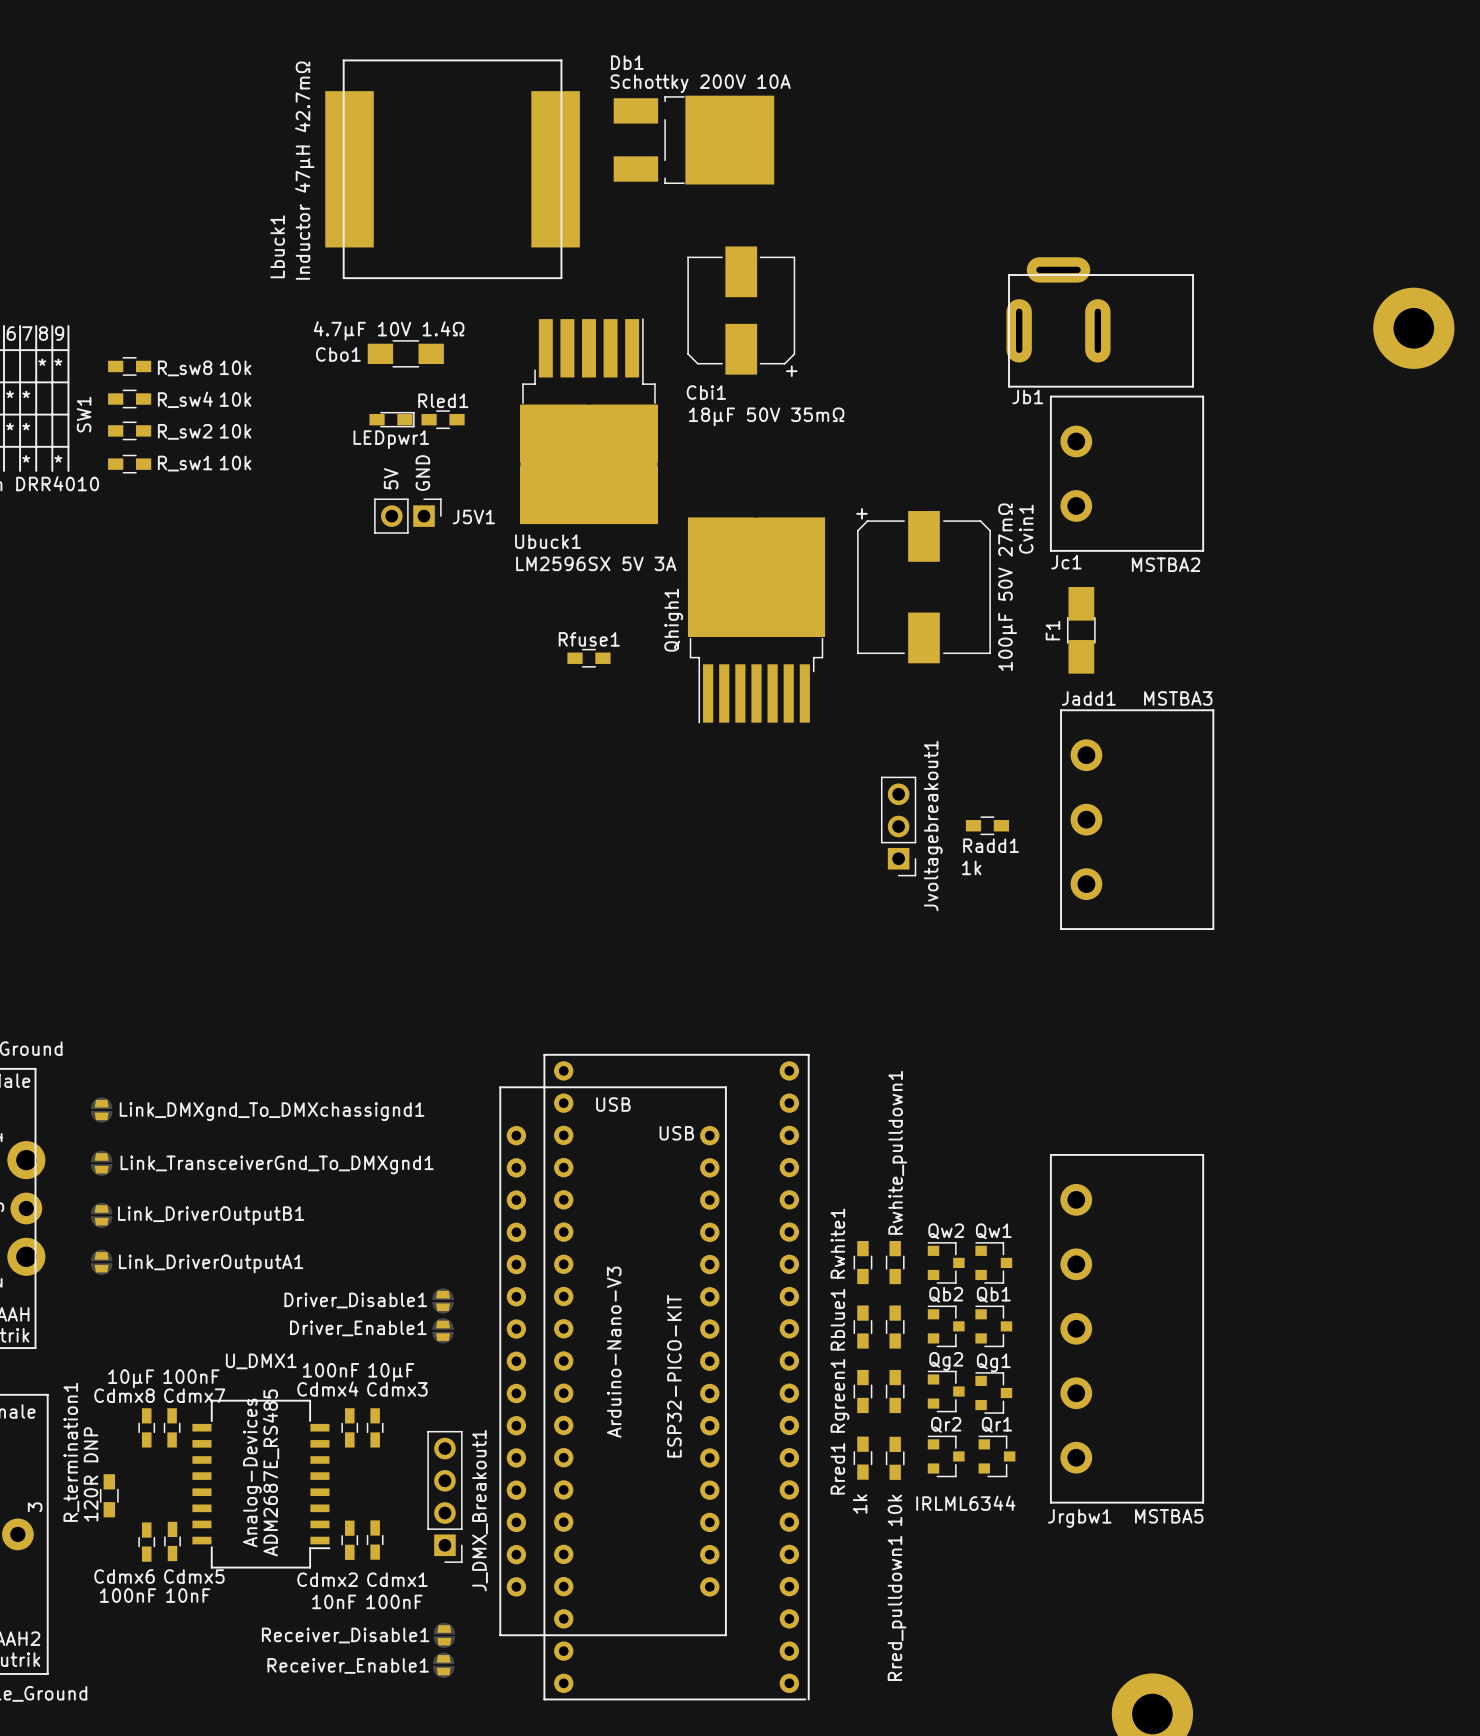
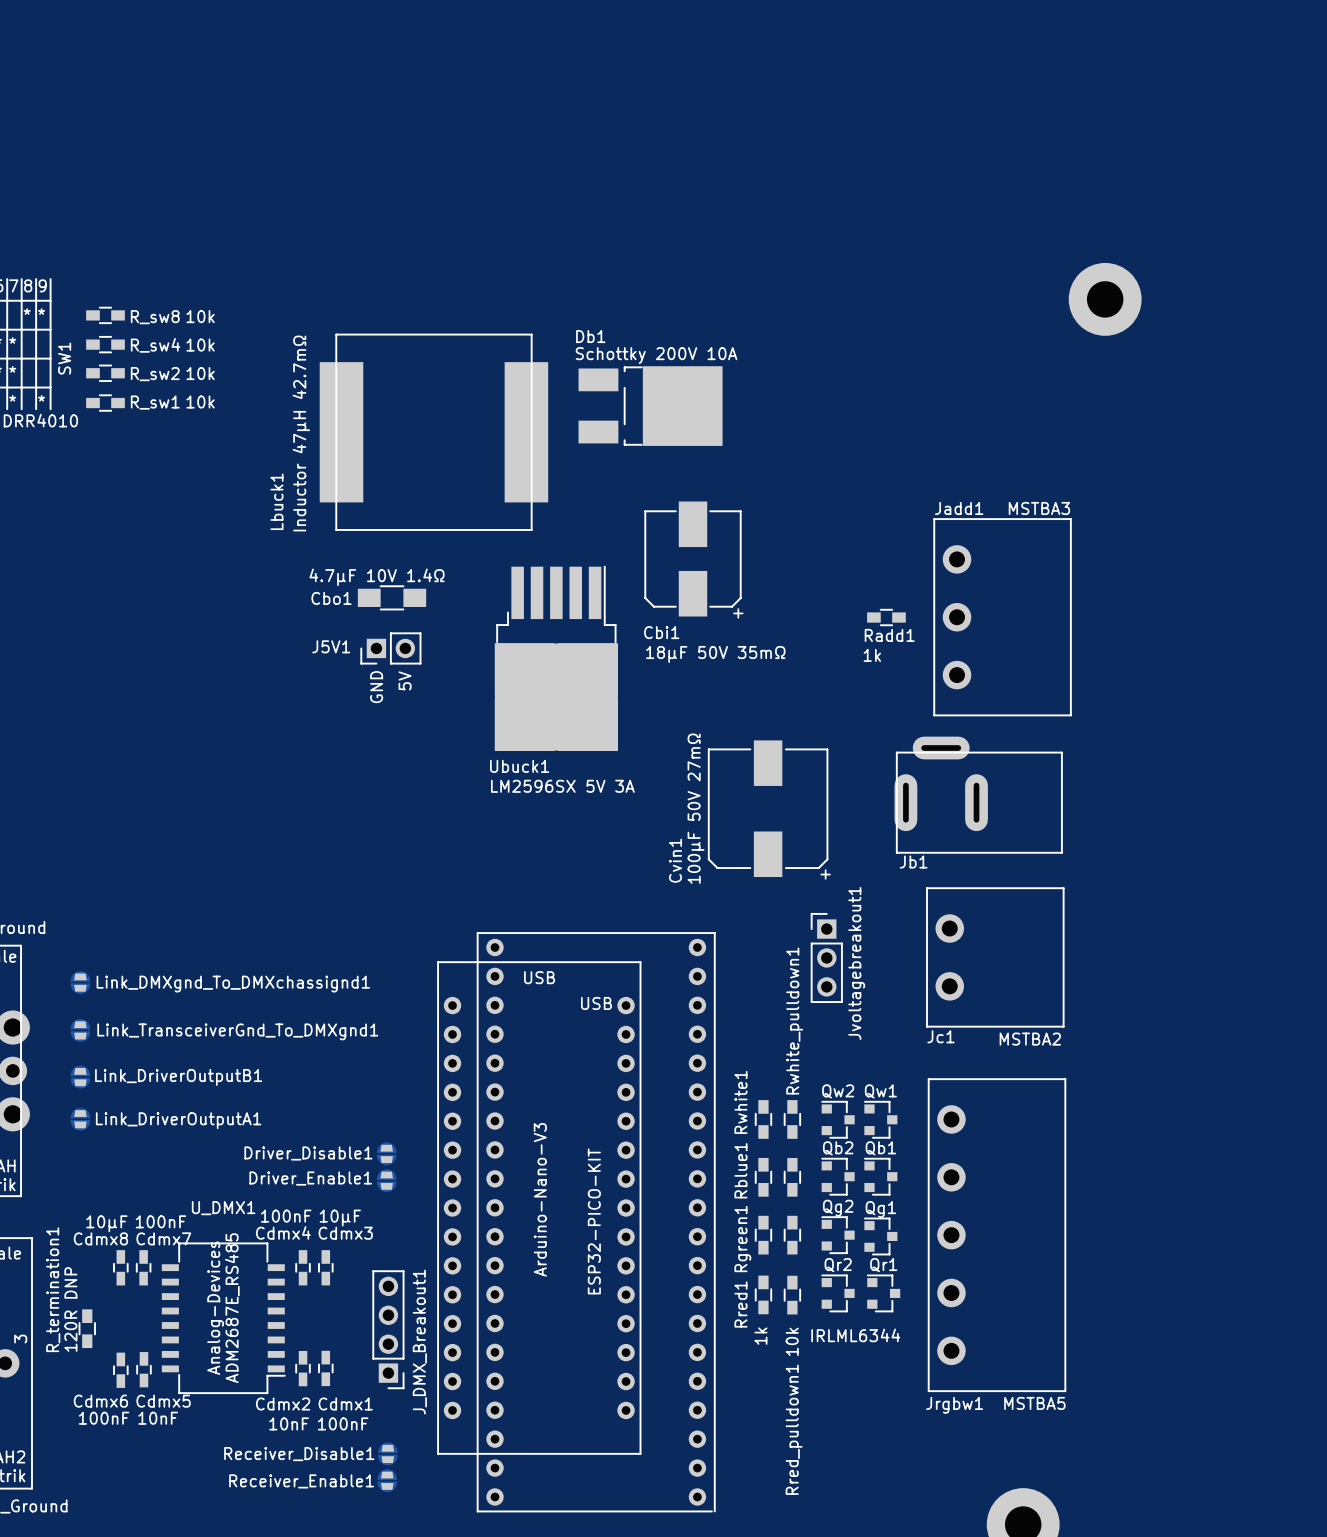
Db1 position: (693, 140) -> (650, 406)
Lbuck1 position: (452, 169) -> (433, 432)
Cbi1 position: (741, 310) -> (693, 559)
Jb1 position: (1100, 322) -> (978, 795)
part position: (1413, 328) -> (1105, 299)
Cbo1 position: (405, 353) -> (392, 597)
LEDpwr1: (392, 419) -> none
Rled1: (443, 419) -> none
Ubuck1 position: (588, 421) -> (556, 658)
Jc1 position: (1127, 473) -> (995, 957)
J5V1 rotation: 0° (407, 516) -> 180° (390, 648)
J5V1 position: (407, 516) -> (390, 648)
Cvin1 rotation: 0° (924, 587) -> 180° (768, 808)
Cvin1 position: (924, 587) -> (768, 808)
Qhigh1: (756, 620) -> none
F1: (1081, 630) -> none
Rfuse1: (588, 658) -> none
Jadd1 position: (1137, 819) -> (1002, 617)
Radd1 position: (987, 825) -> (886, 617)
Jvoltagebreakout1 rotation: 0° (898, 826) -> 180° (826, 957)
Jvoltagebreakout1 position: (898, 826) -> (826, 957)
Jrgbw1 position: (1127, 1328) -> (997, 1235)

